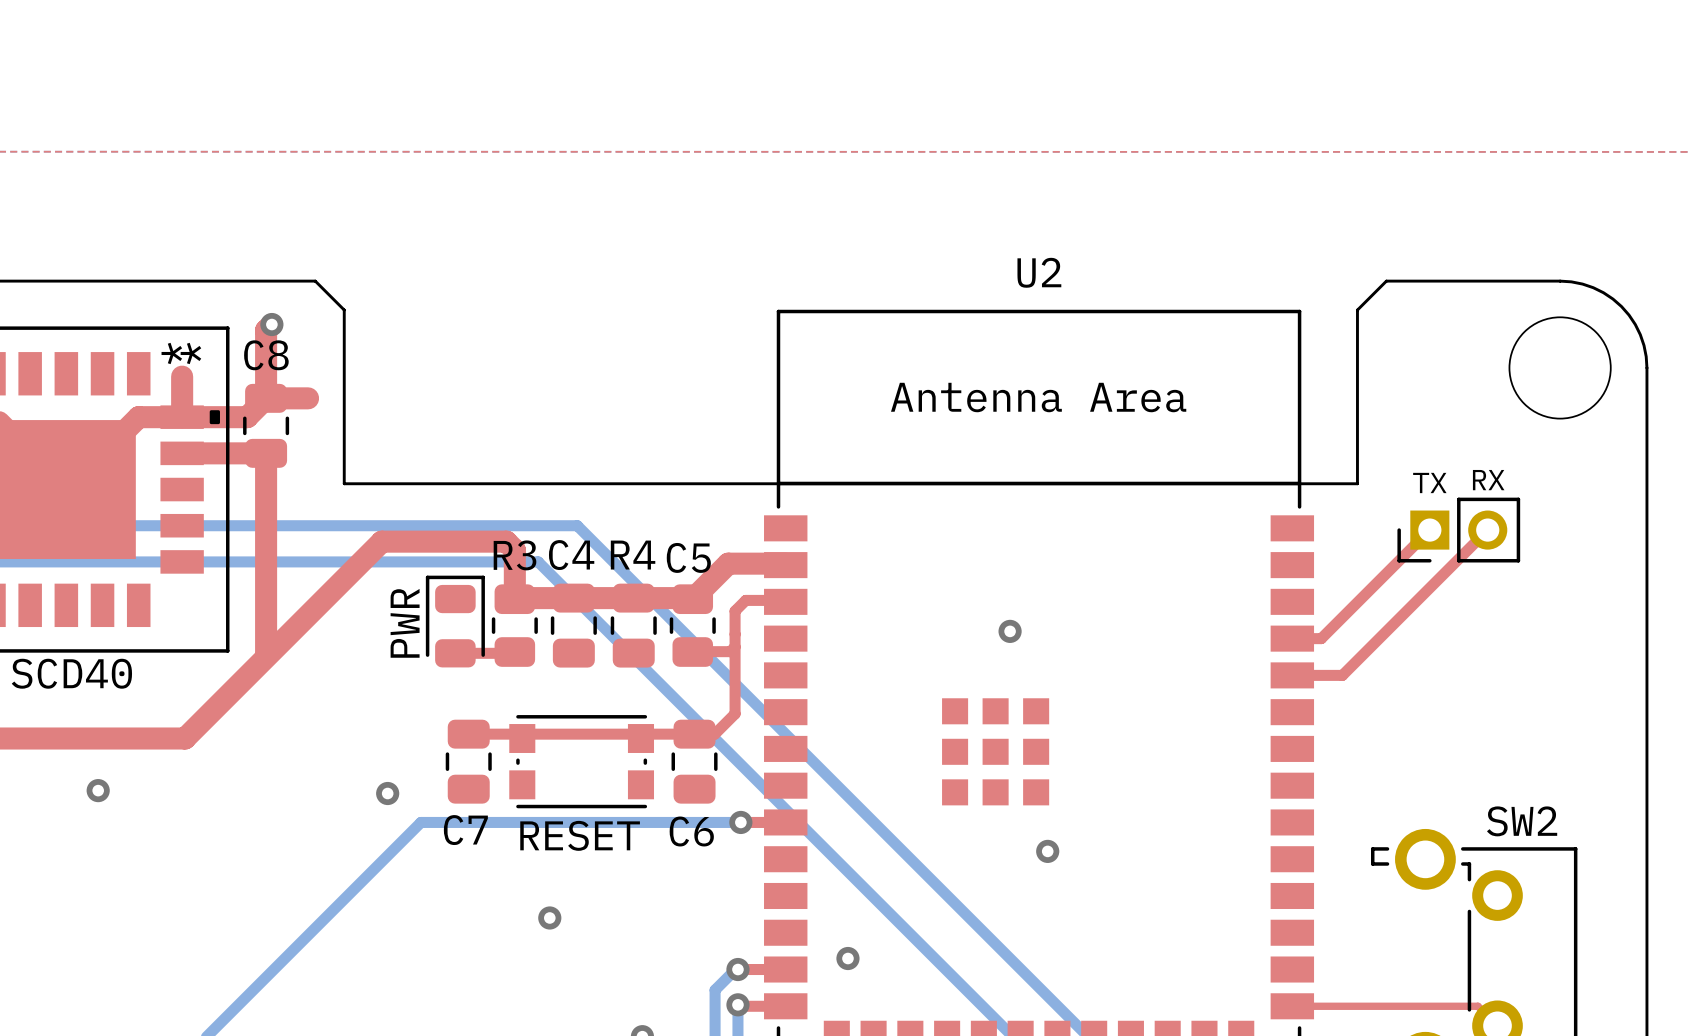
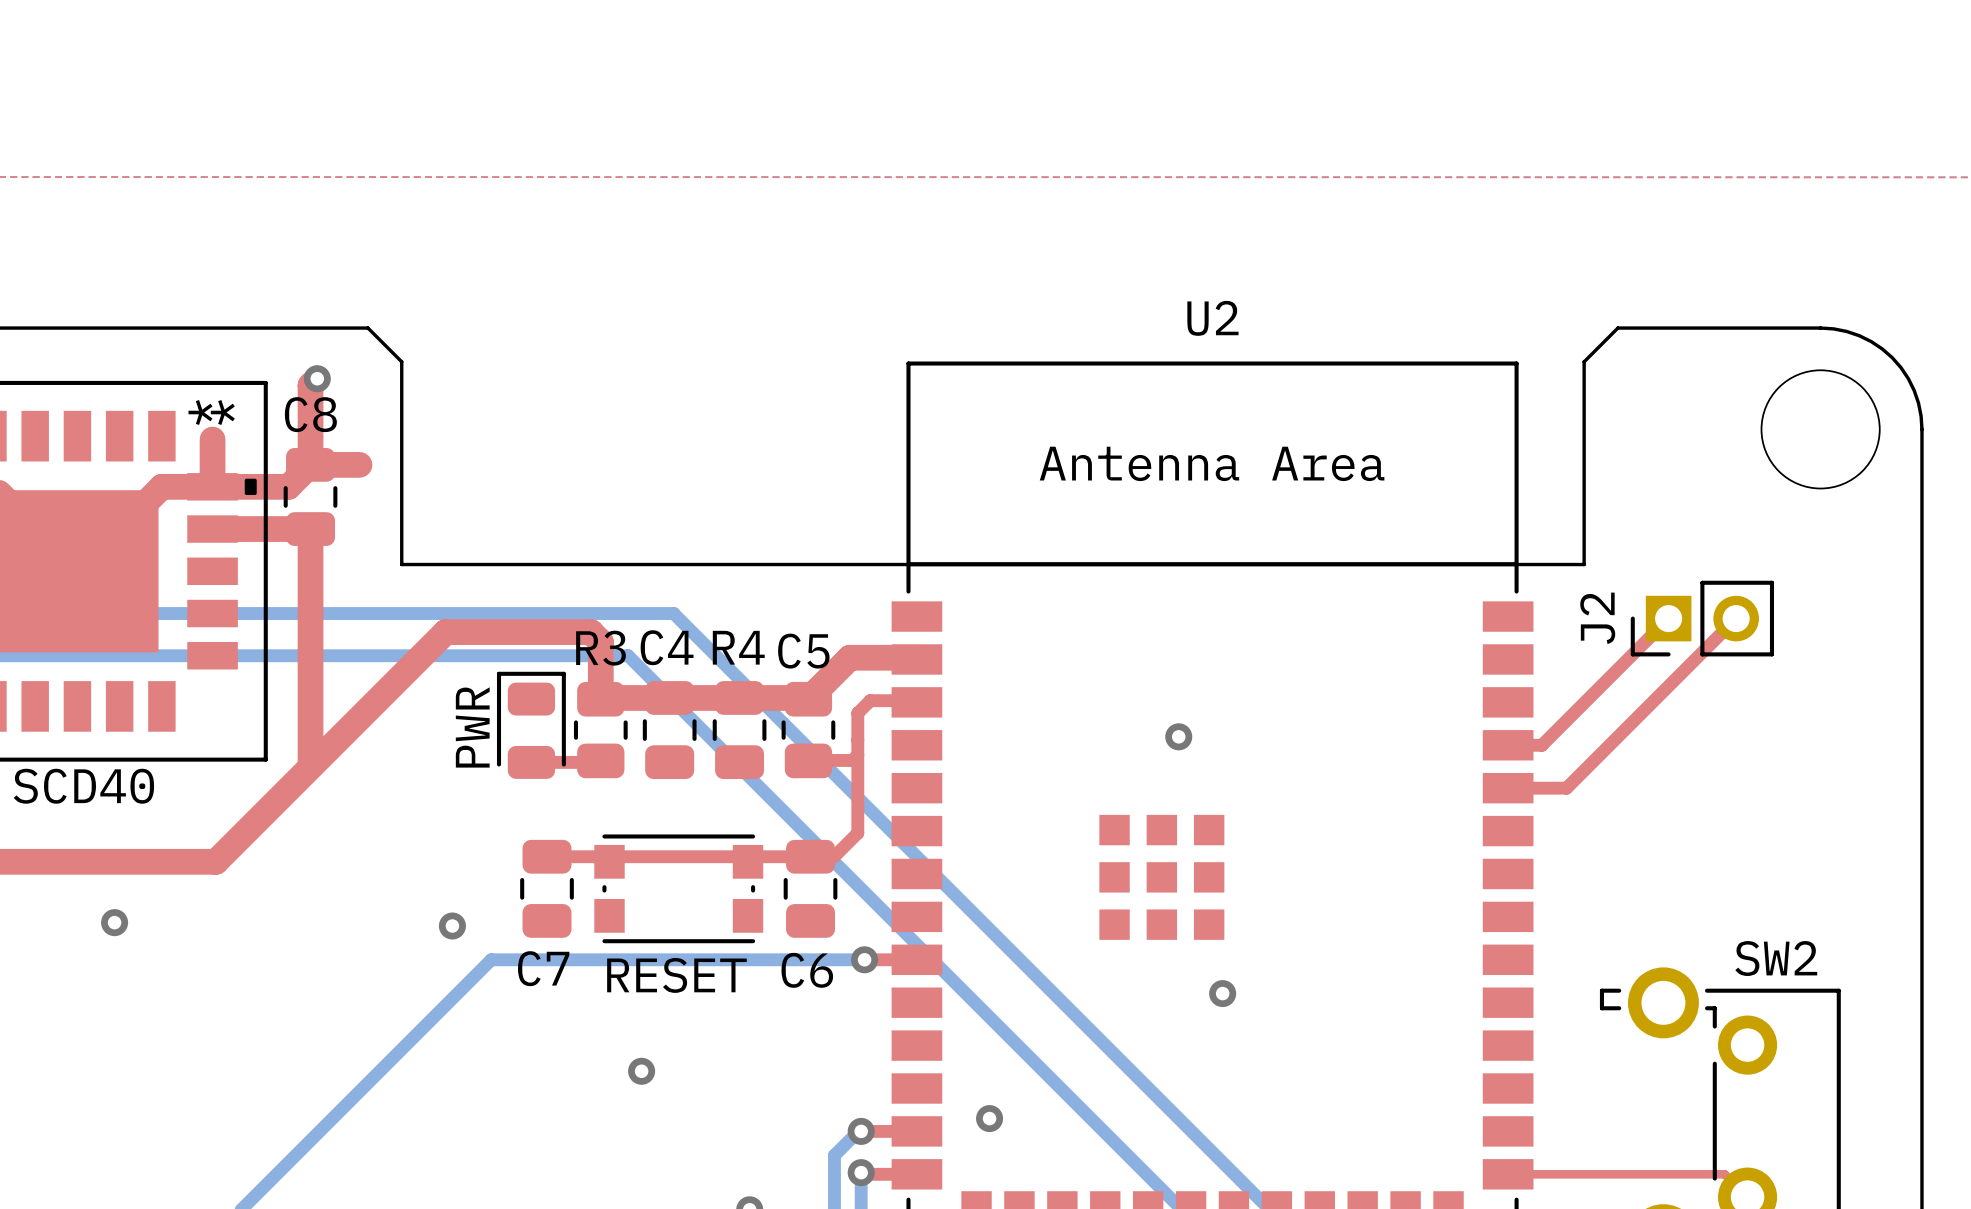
text: RX (1488, 480) -> none
text: TX (1429, 482) -> none
J2 name: none -> J2 (1597, 618)

